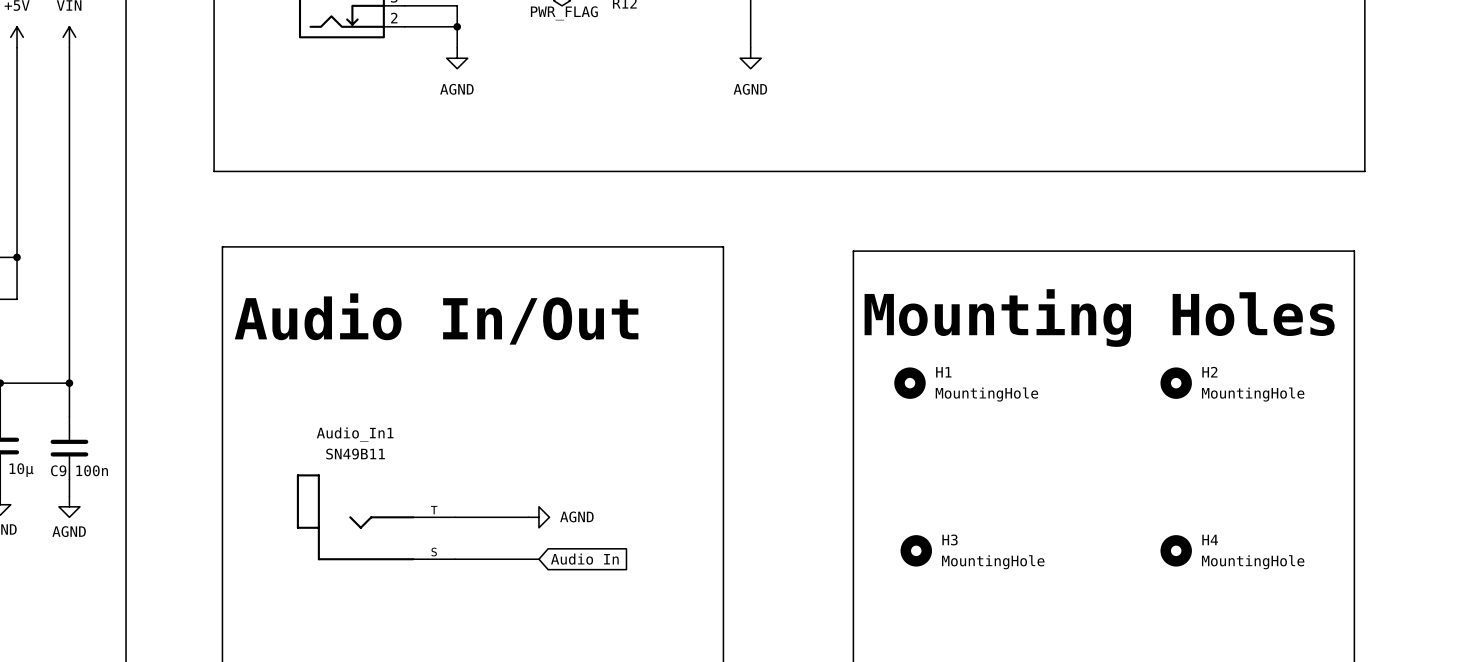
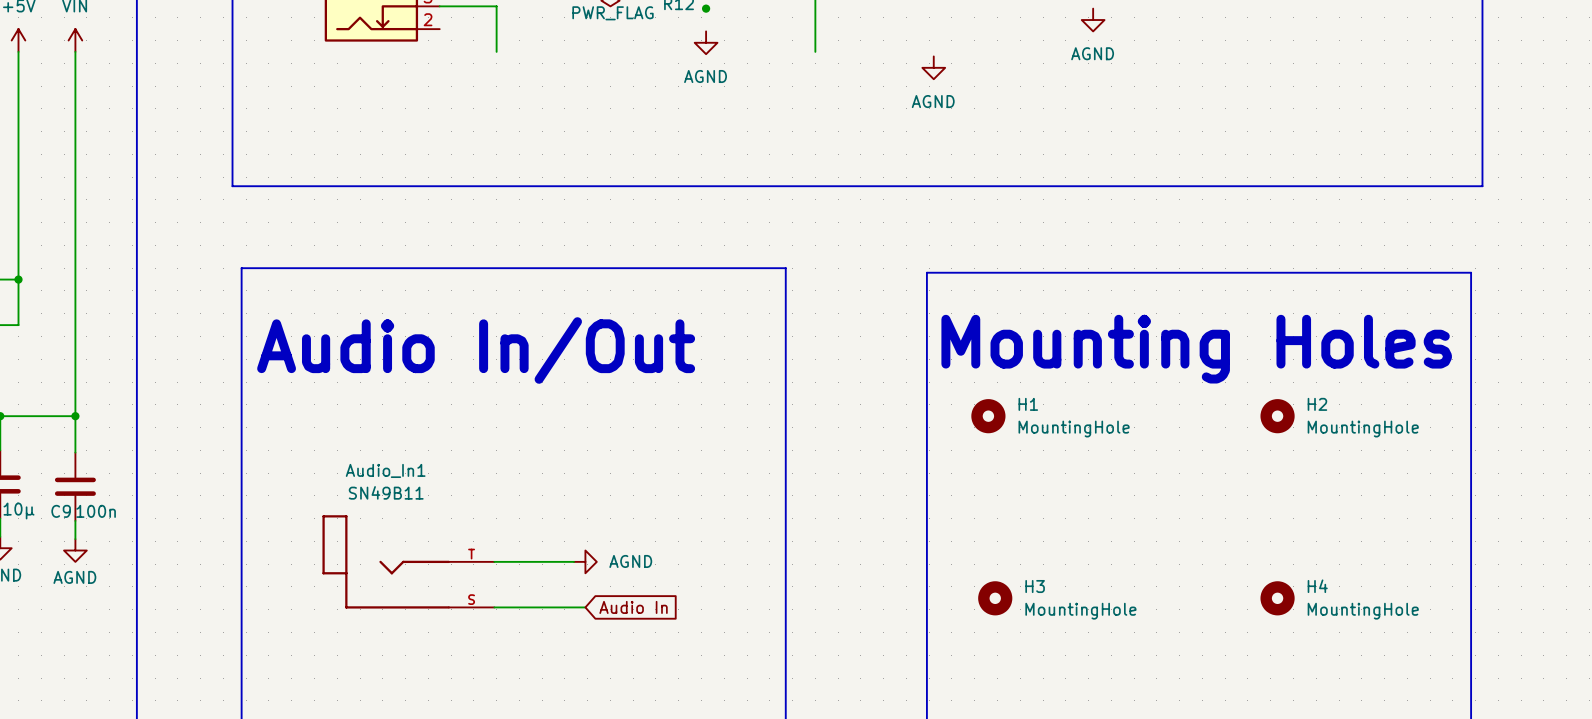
junction: none -> (706, 8)
power symbol: none -> AGND (1093, 20)
wire: (404, 26) (457, 26) -> none
junction: (457, 26) -> none
power symbol: none -> AGND (706, 42)
power symbol: AGND (457, 58) -> none
power symbol: AGND (750, 58) -> none
power symbol: none -> AGND (933, 67)

